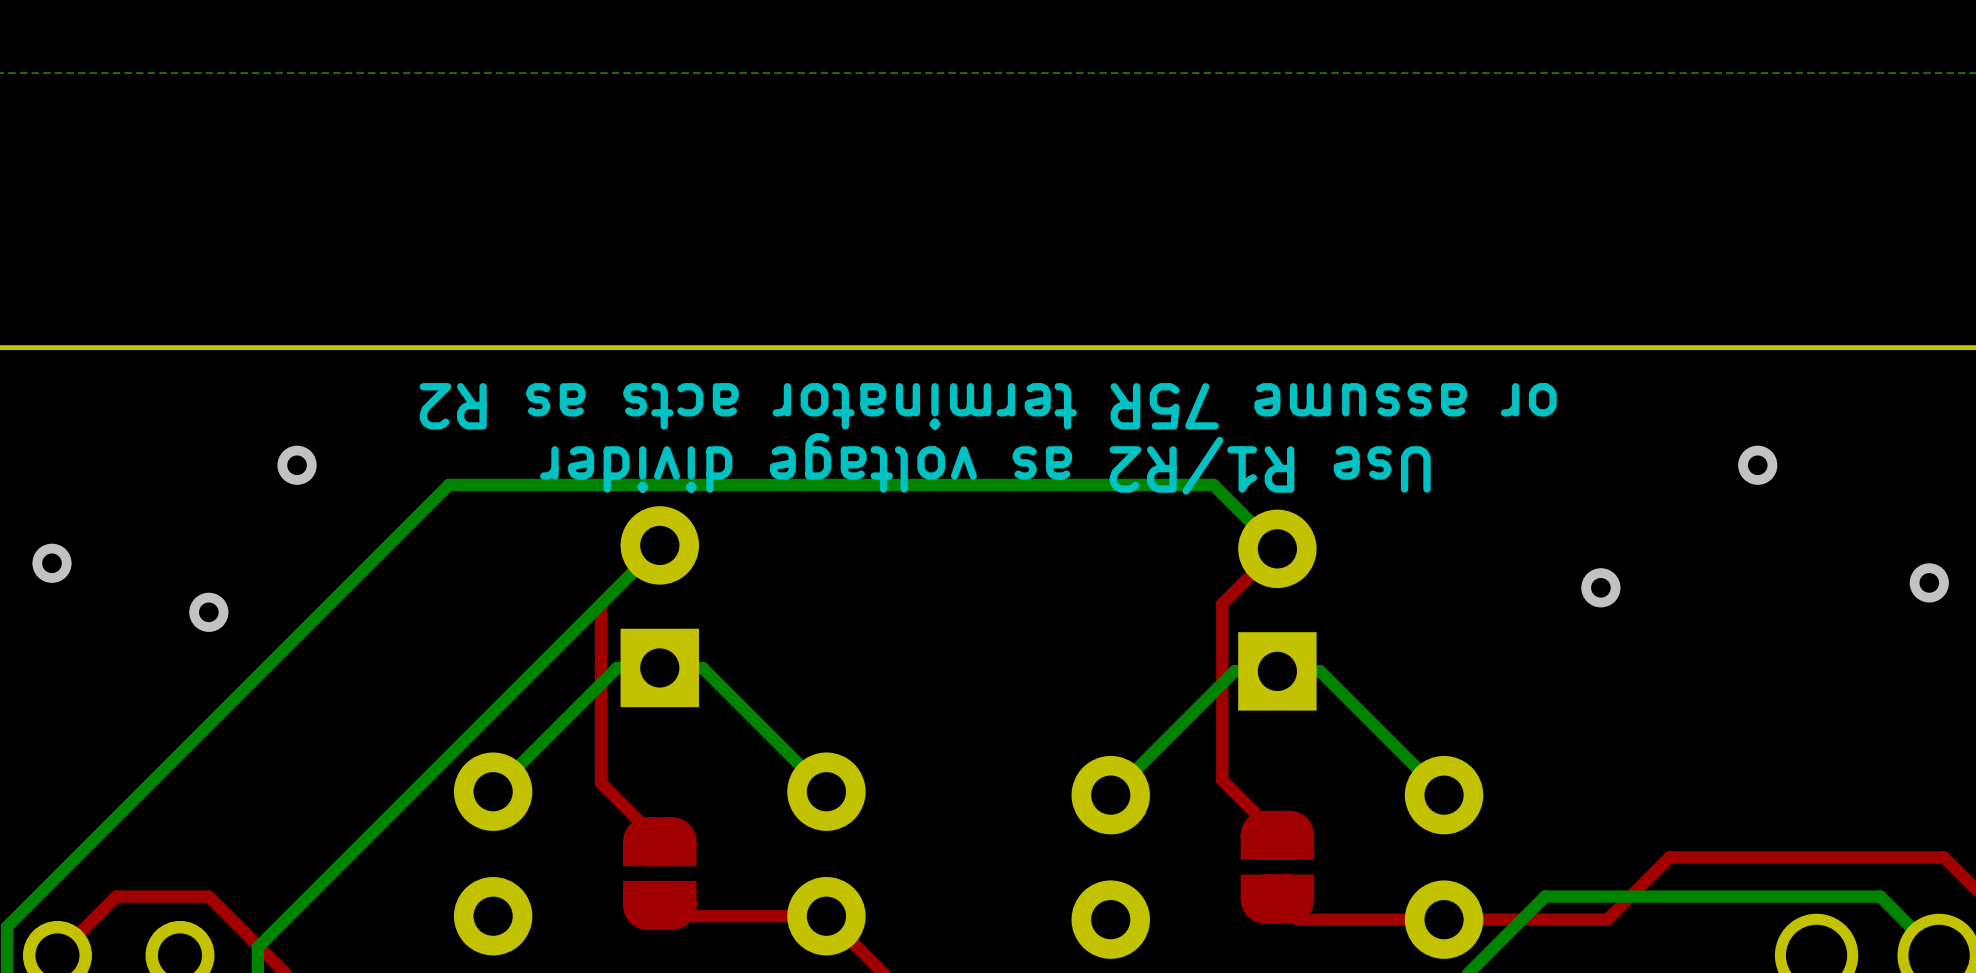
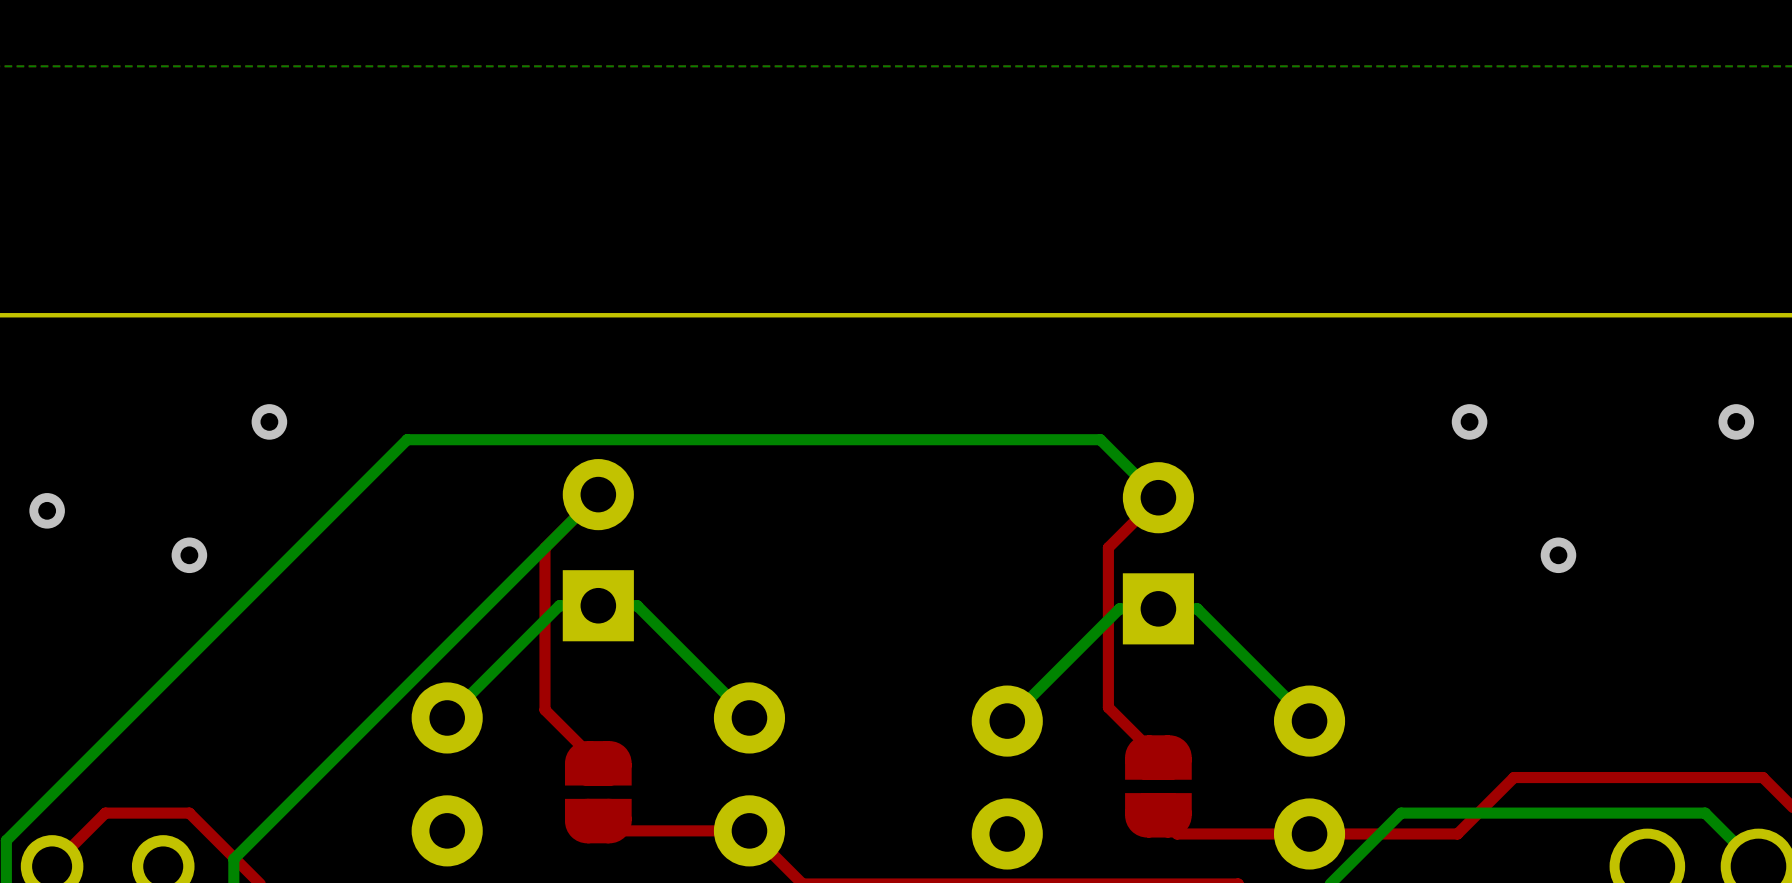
text: or assume 75R terminator acts as R2 (988, 406) -> none
text: Use R1/R2 as voltage divider (985, 463) -> none
via: none -> (1469, 421)
via: (1757, 465) -> none
via: none -> (1736, 421)
via: (1929, 582) -> none
via: (1600, 587) -> none
via: none -> (1558, 555)

